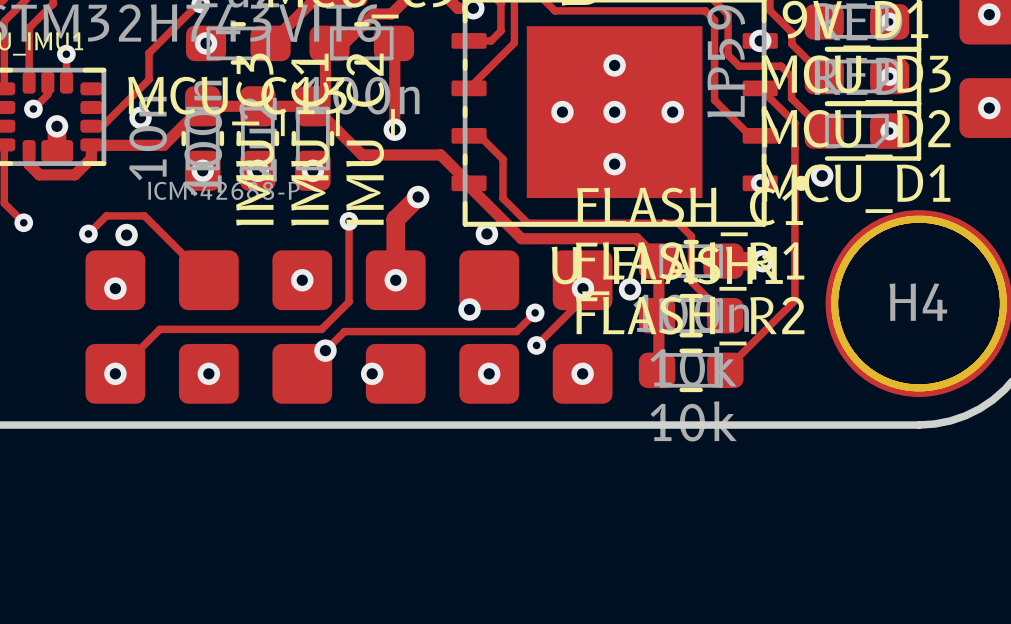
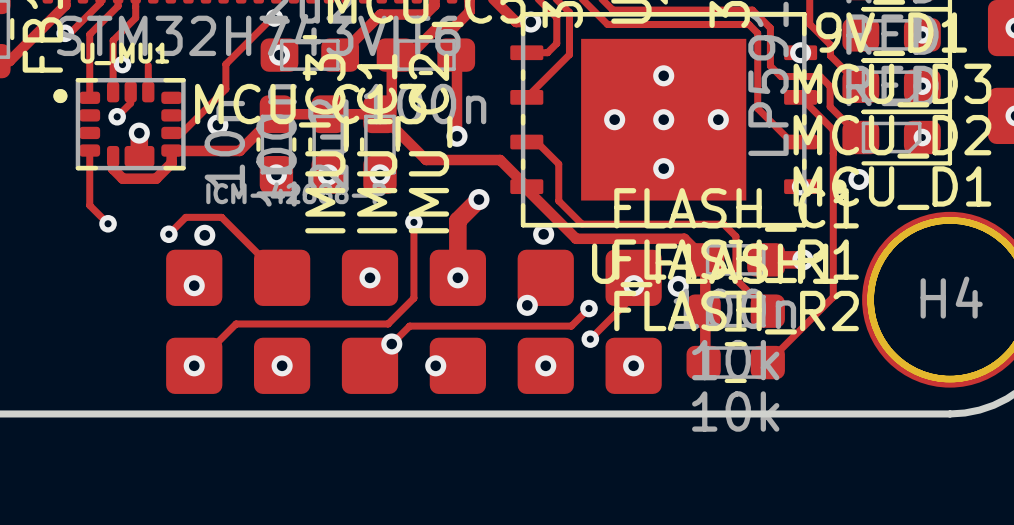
via position: (66, 54) -> (122, 64)

